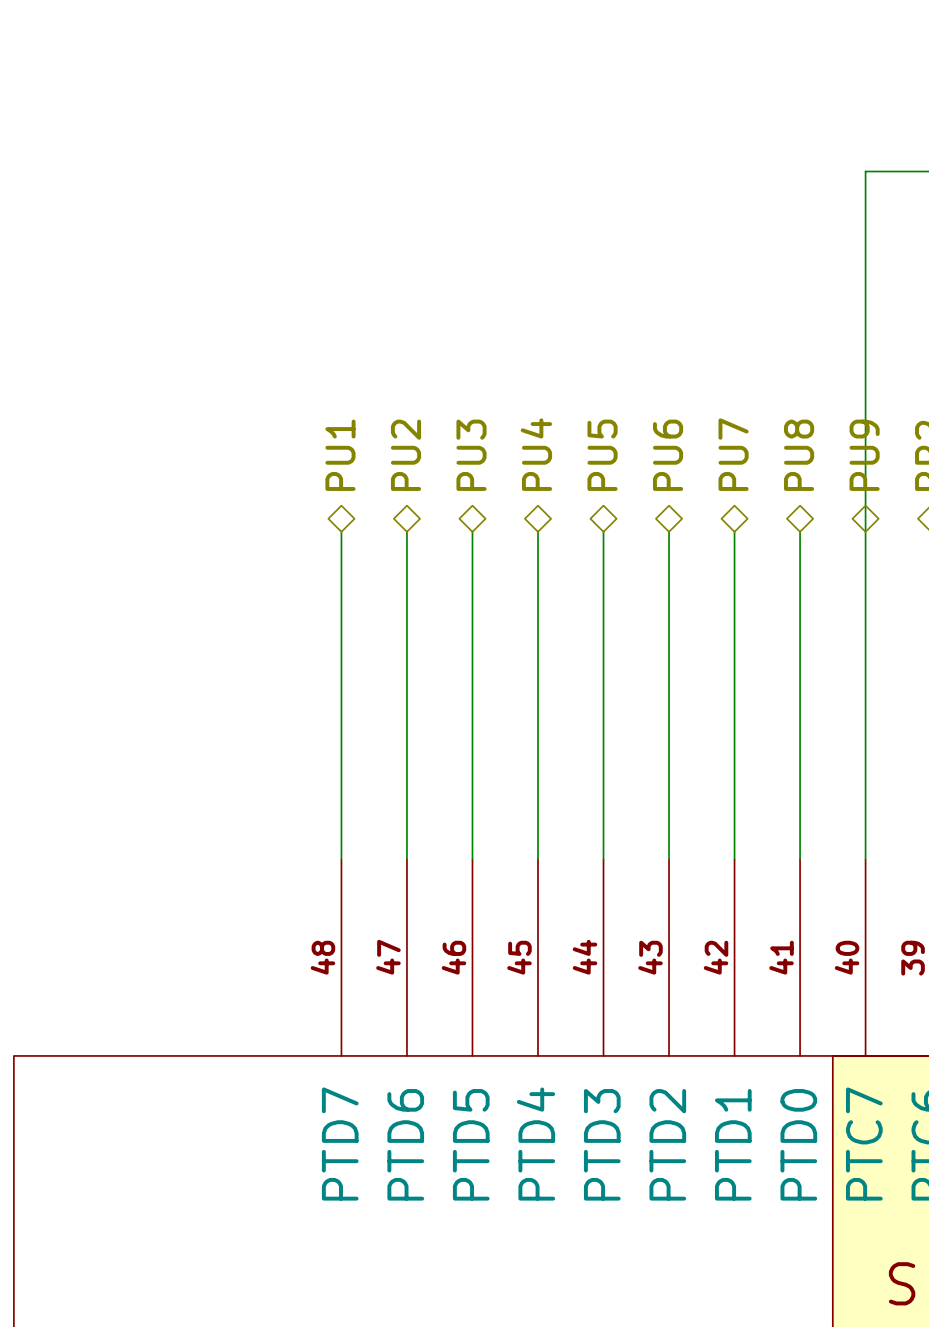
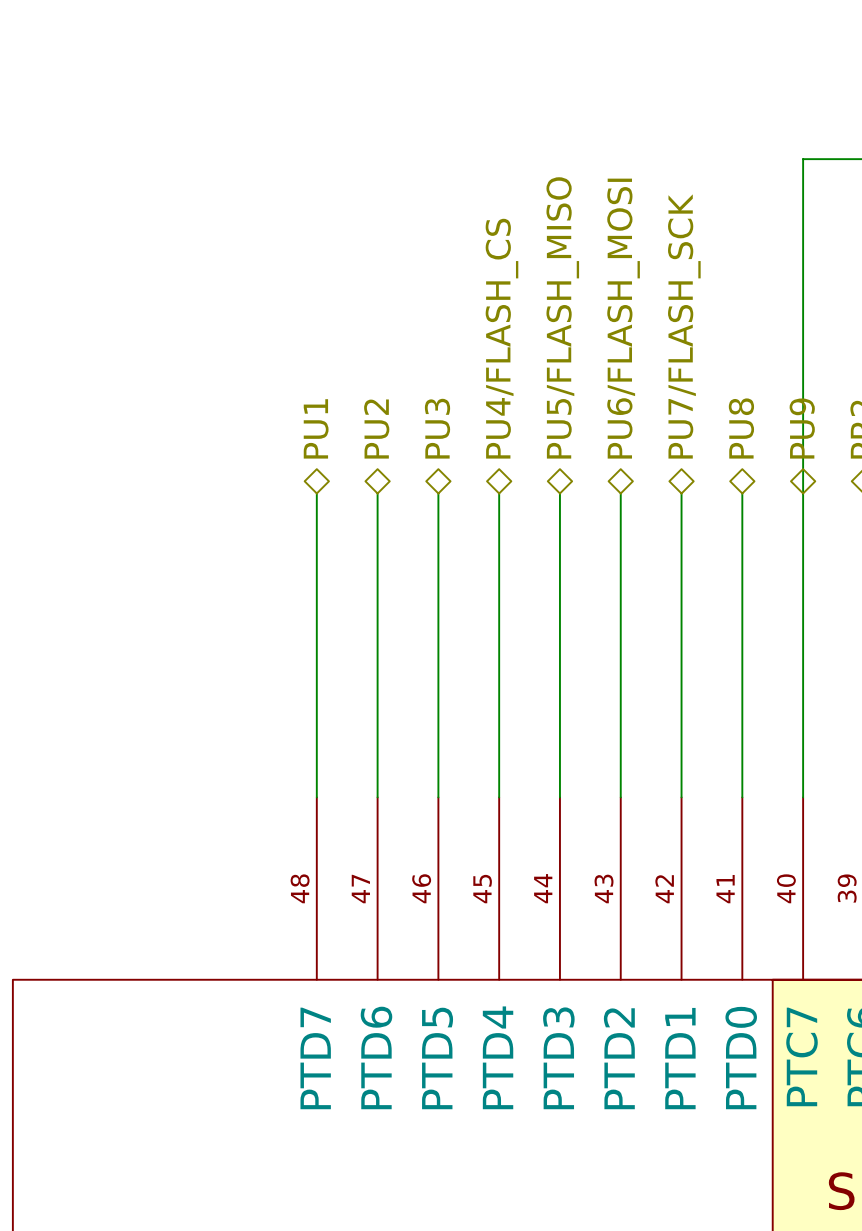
hierarchical label: PU4 (536, 454) -> PU4/FLASH_CS (501, 338)
hierarchical label: PU7 (733, 454) -> PU7/FLASH_SCK (684, 326)
hierarchical label: PU5 (602, 455) -> PU5/FLASH_MISO (562, 317)
hierarchical label: PU6 (668, 455) -> PU6/FLASH_MOSI (623, 318)

